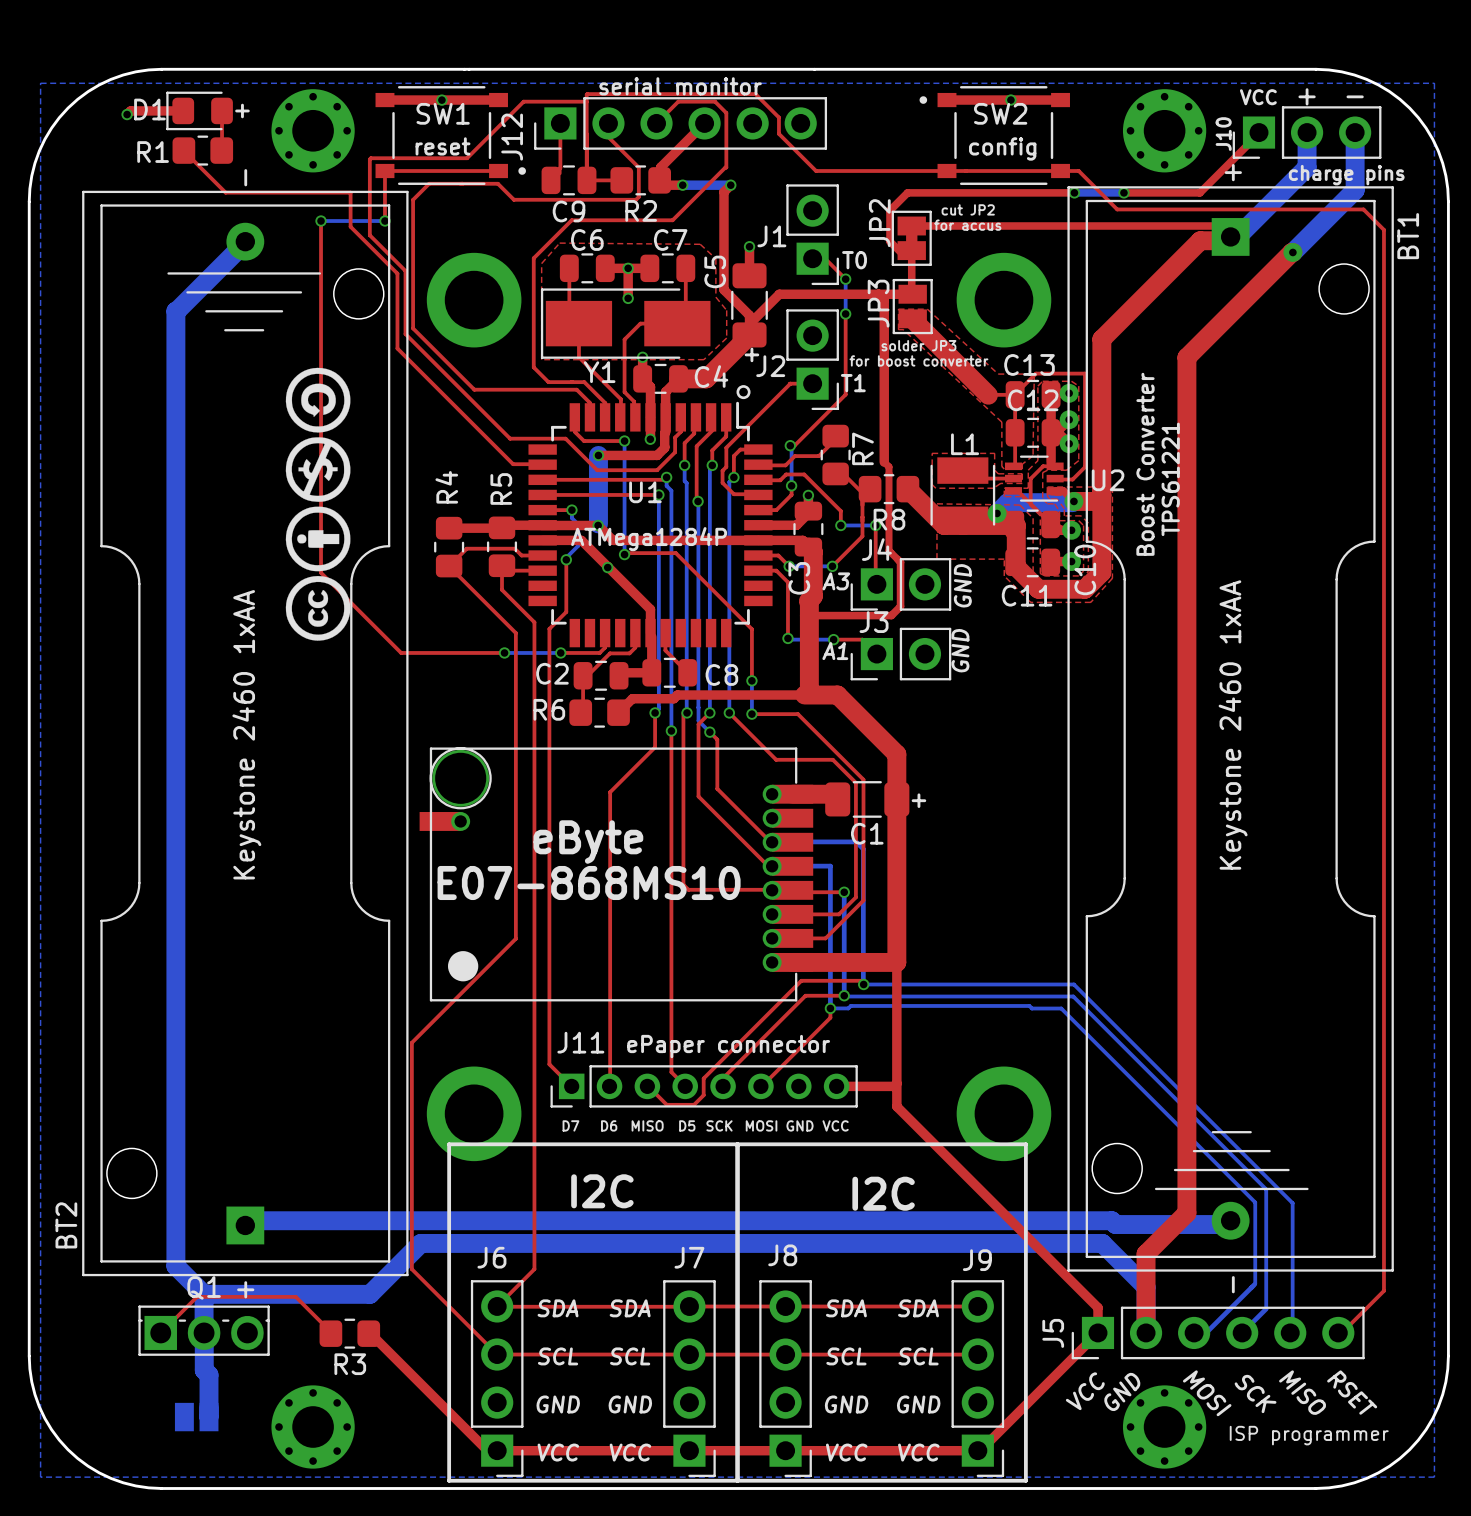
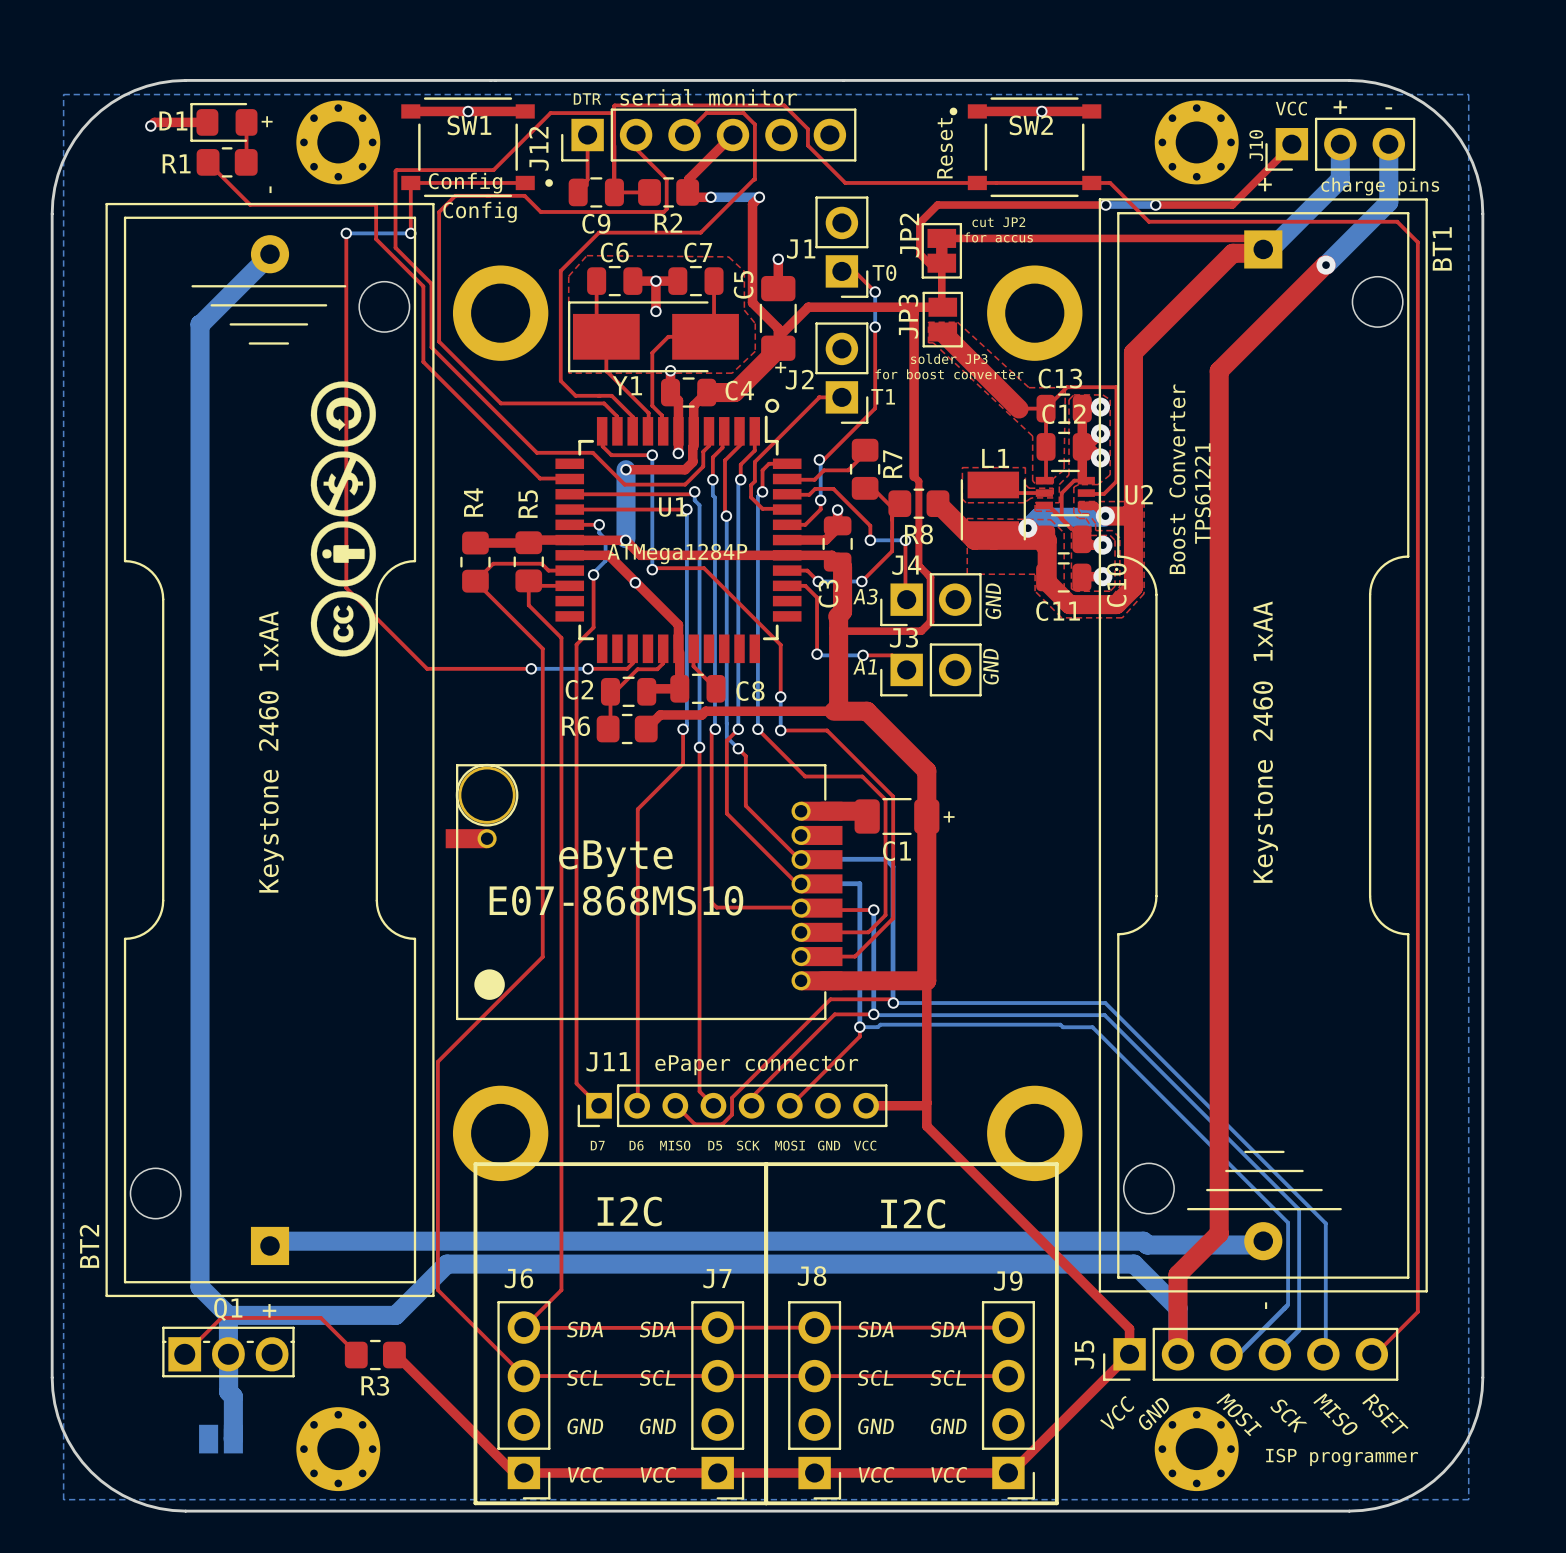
text: none -> DTR (587, 98)
text: none -> Reset (945, 148)
text: reset (443, 146) -> none
text: config (1002, 148) -> none
text: none -> Config (465, 183)
text: none -> Config (480, 212)

